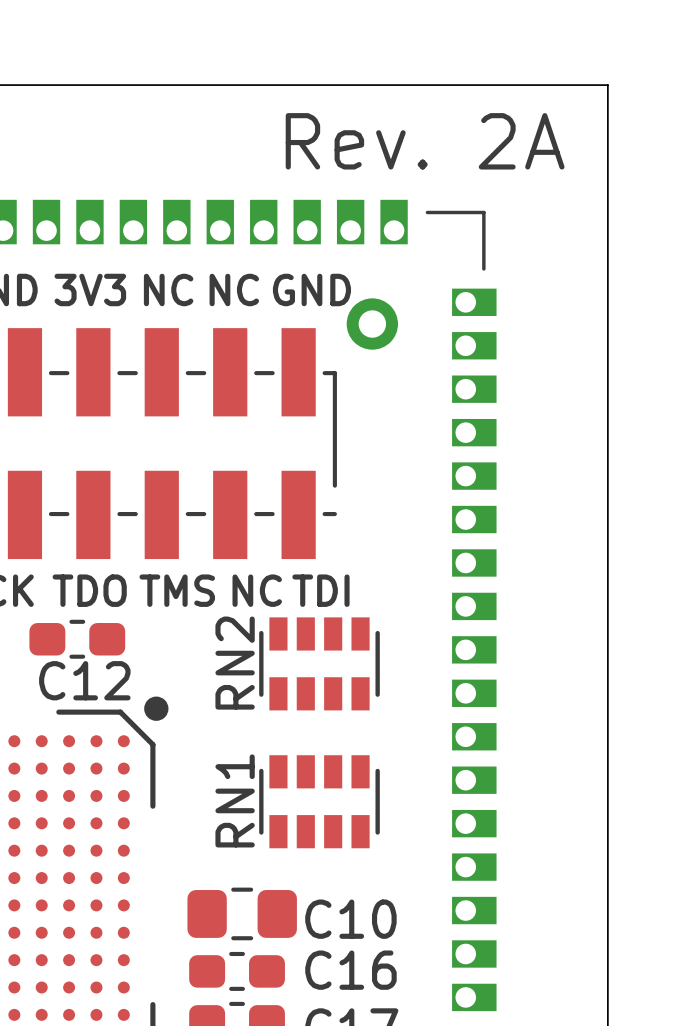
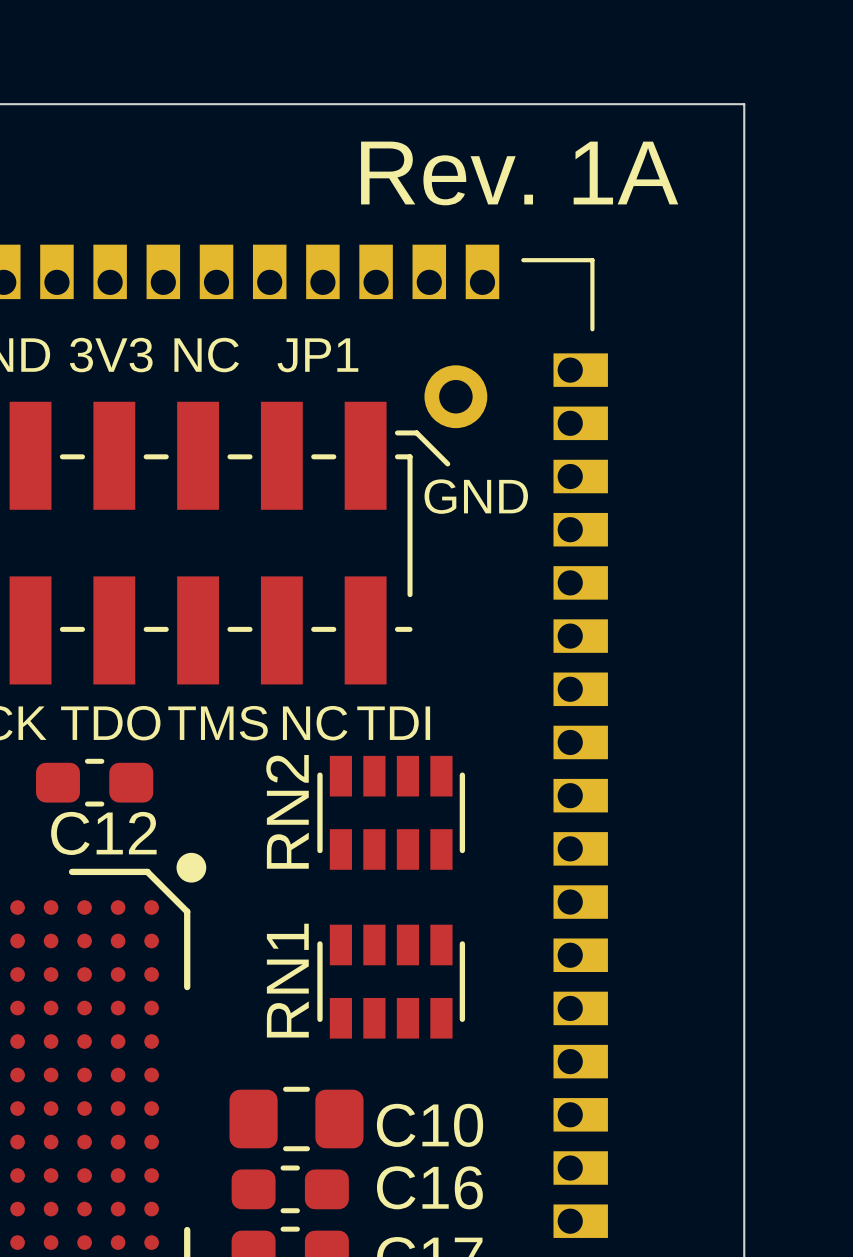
text: Rev. 2A (425, 141) -> Rev. 1A (519, 173)
text: NC (234, 289) -> JP1 (317, 355)
text position: GND (311, 289) -> GND (476, 496)
line: none -> (397, 432) (416, 432) (447, 463)

